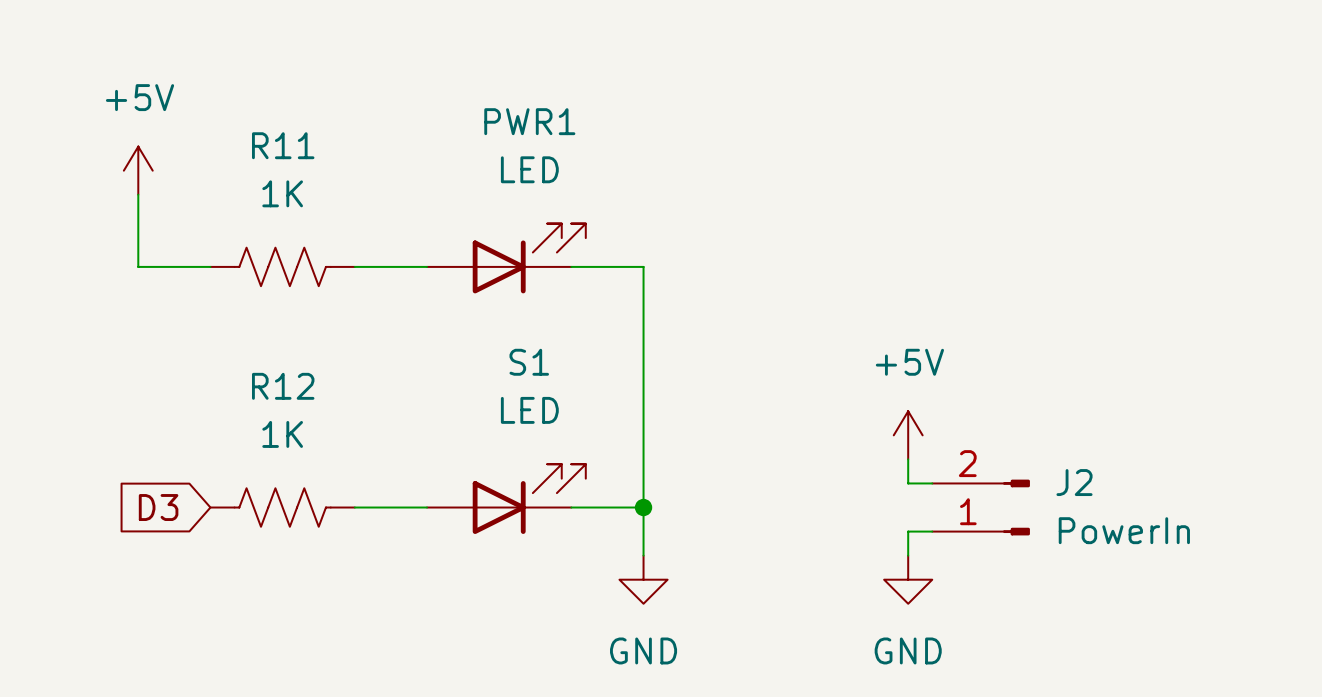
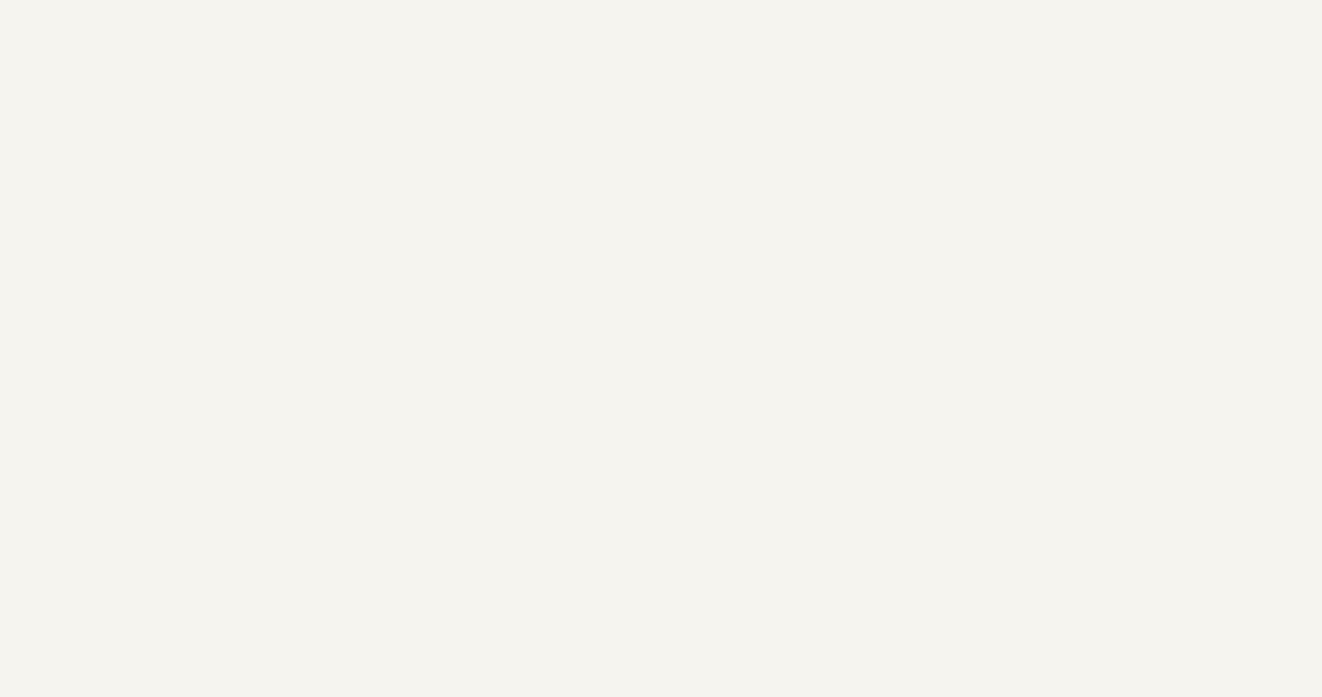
power symbol: +5V (138, 170) -> none
wire: (138, 194) (138, 266) (210, 266) -> none
PWR1: LED (506, 258) -> none
R11: 1K (282, 266) -> none
wire: (354, 266) (427, 266) -> none
wire: (571, 266) (643, 266) (643, 555) -> none
power symbol: +5V (908, 435) -> none
wire: (908, 459) (908, 483) (932, 483) -> none
S1: LED (506, 499) -> none
global label: D3 (158, 507) -> none
R12: 1K (282, 507) -> none
wire: (354, 507) (427, 507) -> none
wire: (571, 507) (643, 507) -> none
junction: (643, 507) -> none
J2: PowerIn (981, 507) -> none
wire: (932, 531) (908, 531) (908, 555) -> none
power symbol: GND (643, 579) -> none
power symbol: GND (908, 579) -> none

